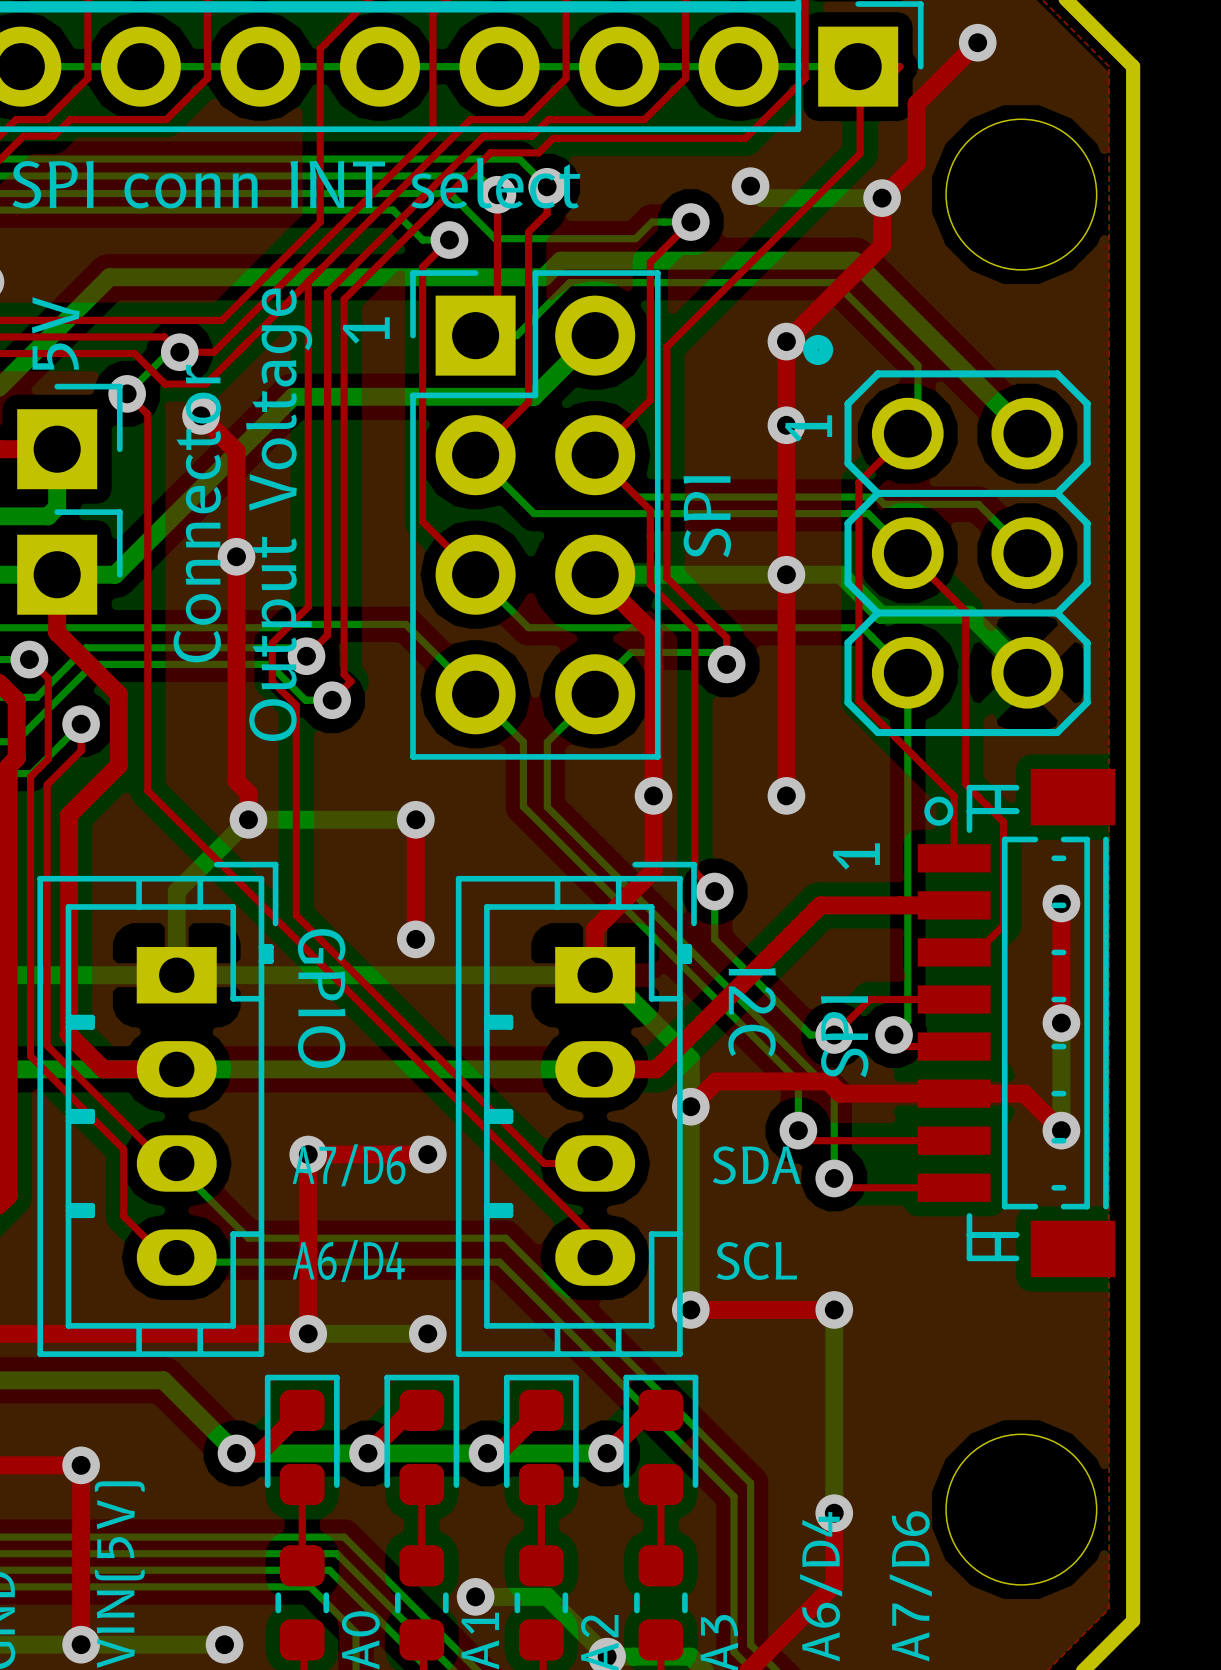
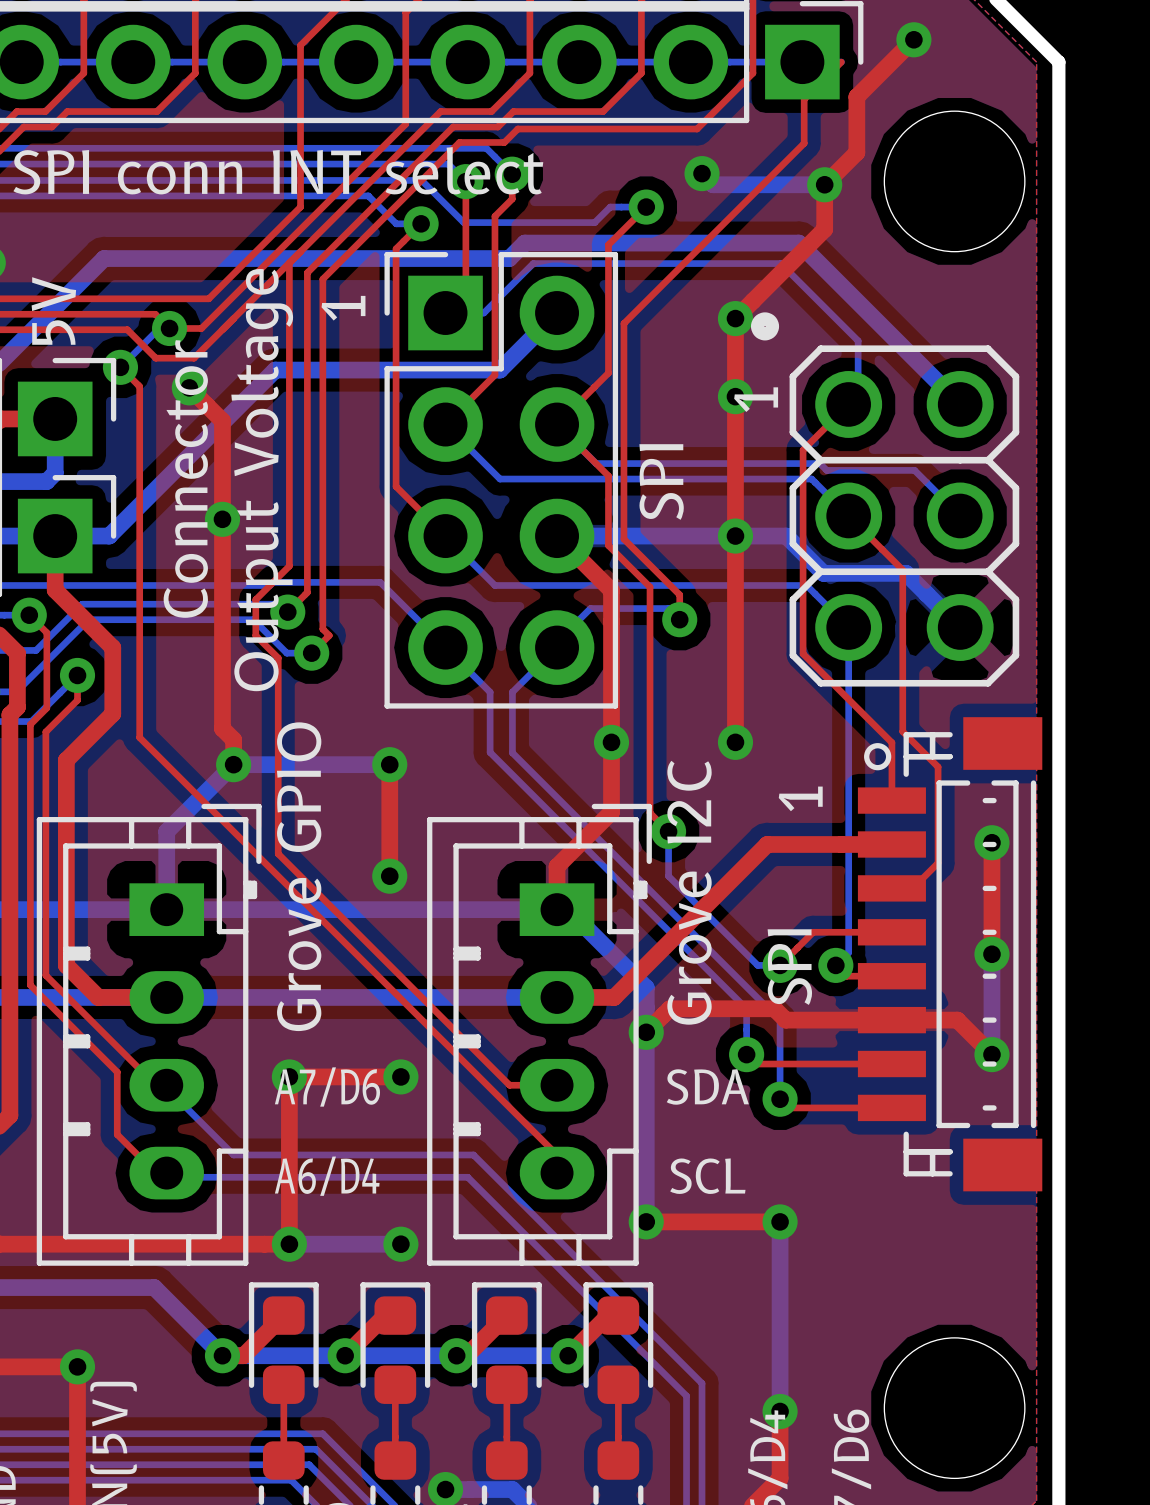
Grove GPIO name: none -> Grove GPIO (299, 876)
Grove I2C name: none -> Grove I2C (689, 892)
text: GPIO (321, 998) -> none
text: I2C (752, 1012) -> none

